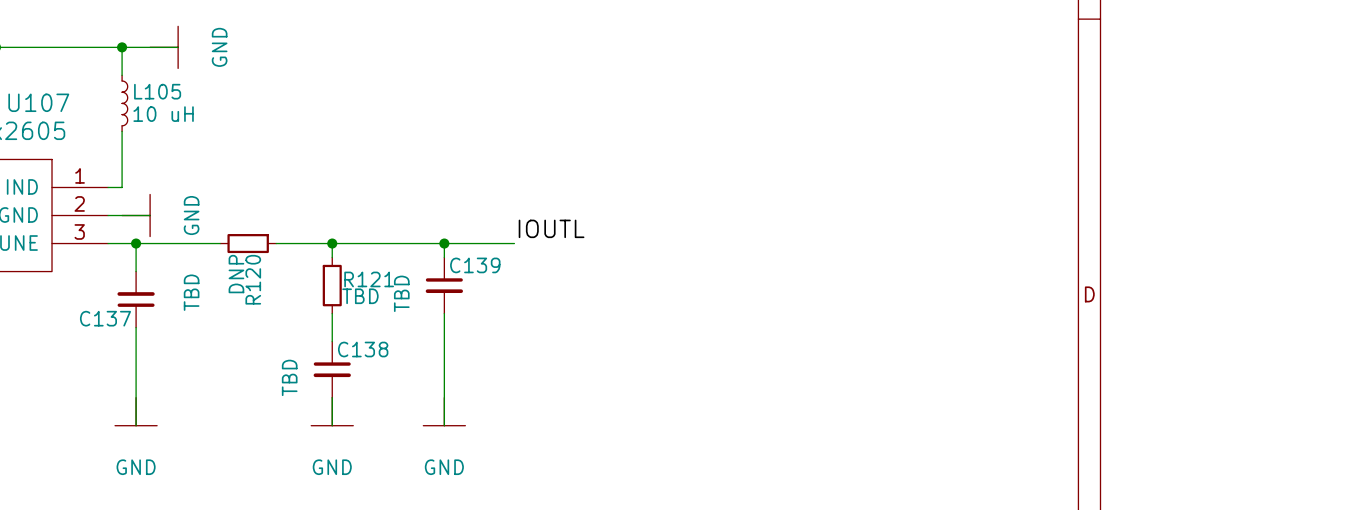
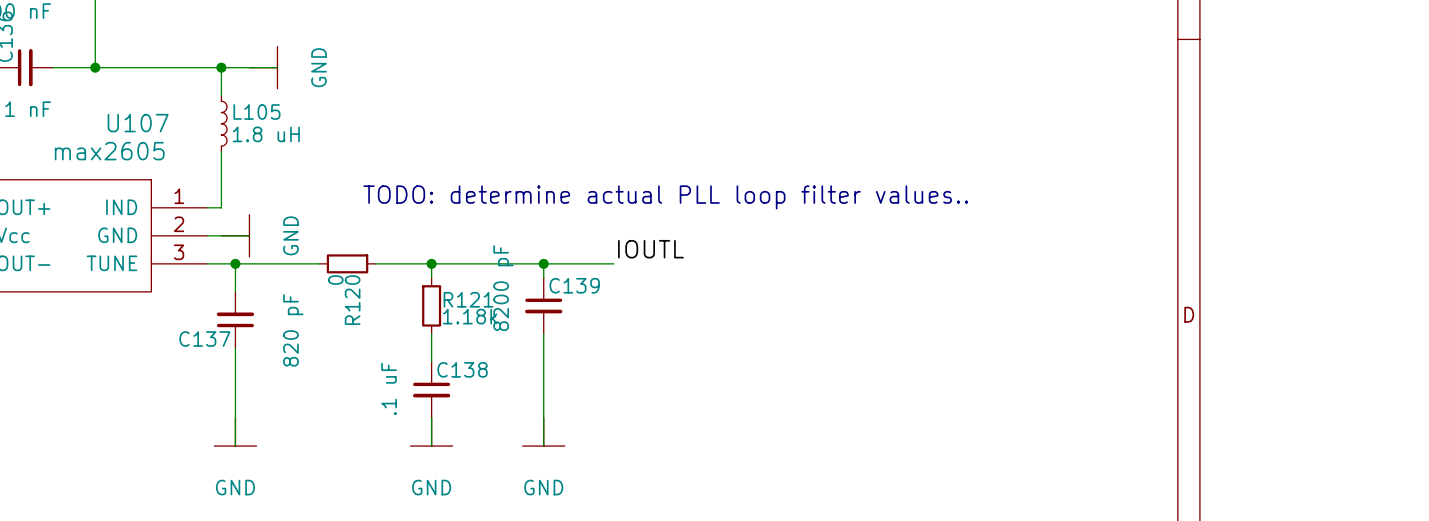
L105 value: 10 uH (163, 114) -> 1.8 uH (266, 134)
text: none -> TODO: determine actual PLL loop filter values.. (665, 197)
R120 value: DNP (236, 274) -> 0 (335, 280)
C137 value: TBD (191, 292) -> 820 pF (293, 330)
C139 value: TBD (401, 293) -> 8200 pF (503, 288)
R121 value: TBD (360, 296) -> 1.18k (470, 316)
C138 value: TBD (289, 377) -> .1 uF (389, 388)

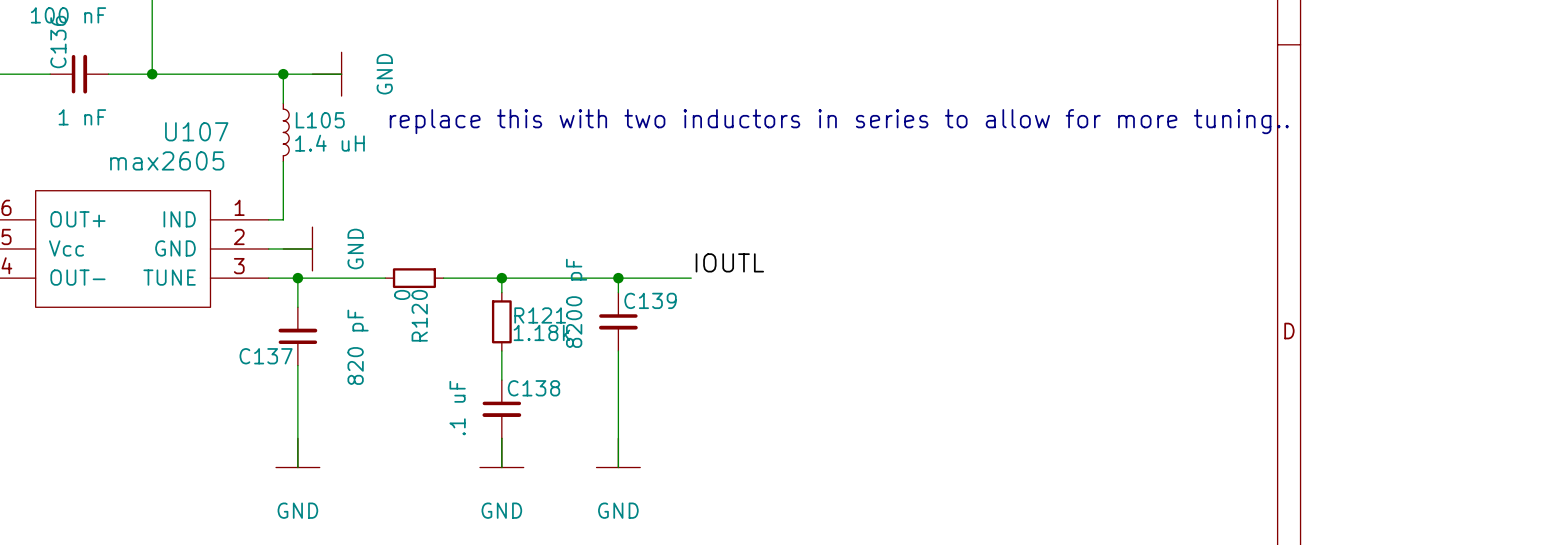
text: none -> replace this with two inductors in series to allow for more tuning.. (839, 121)
L105 value: 1.8 uH (266, 134) -> 1.4 uH (329, 143)
text: TODO: determine actual PLL loop filter values.. (665, 197) -> none

